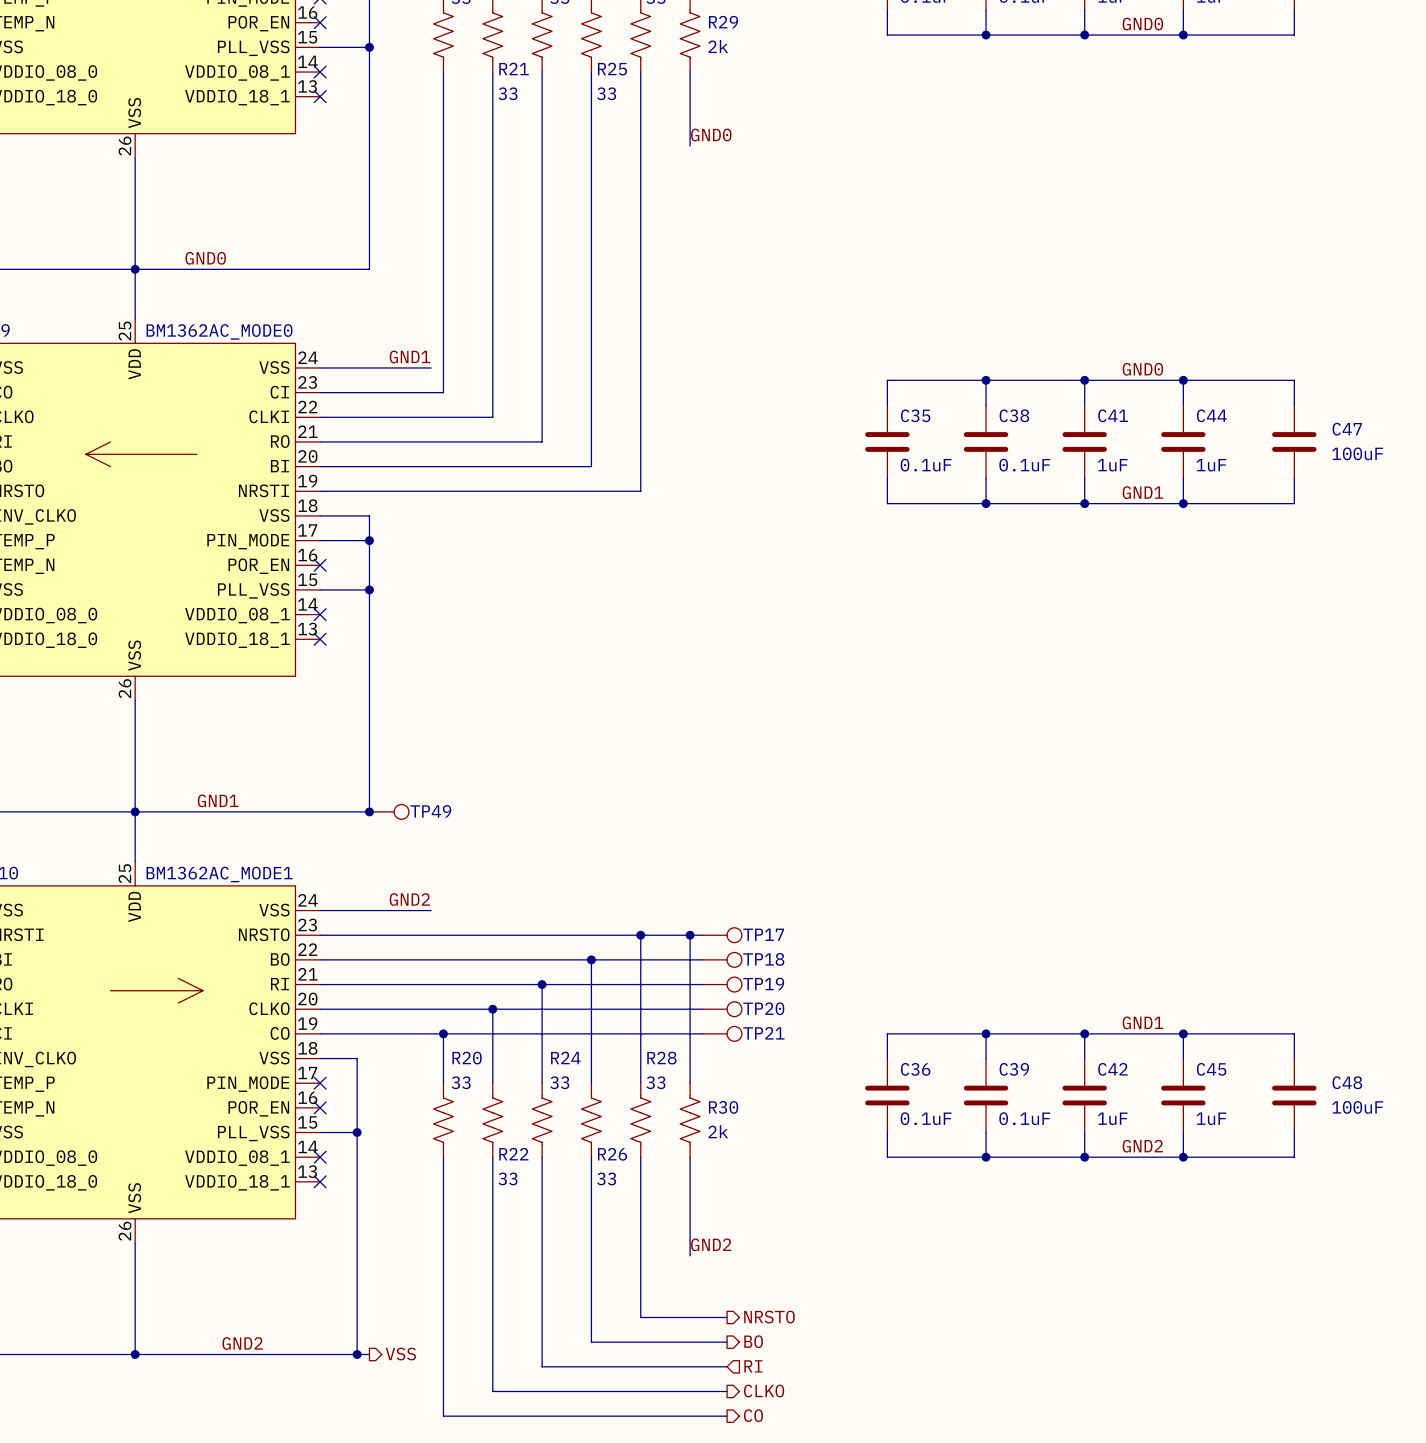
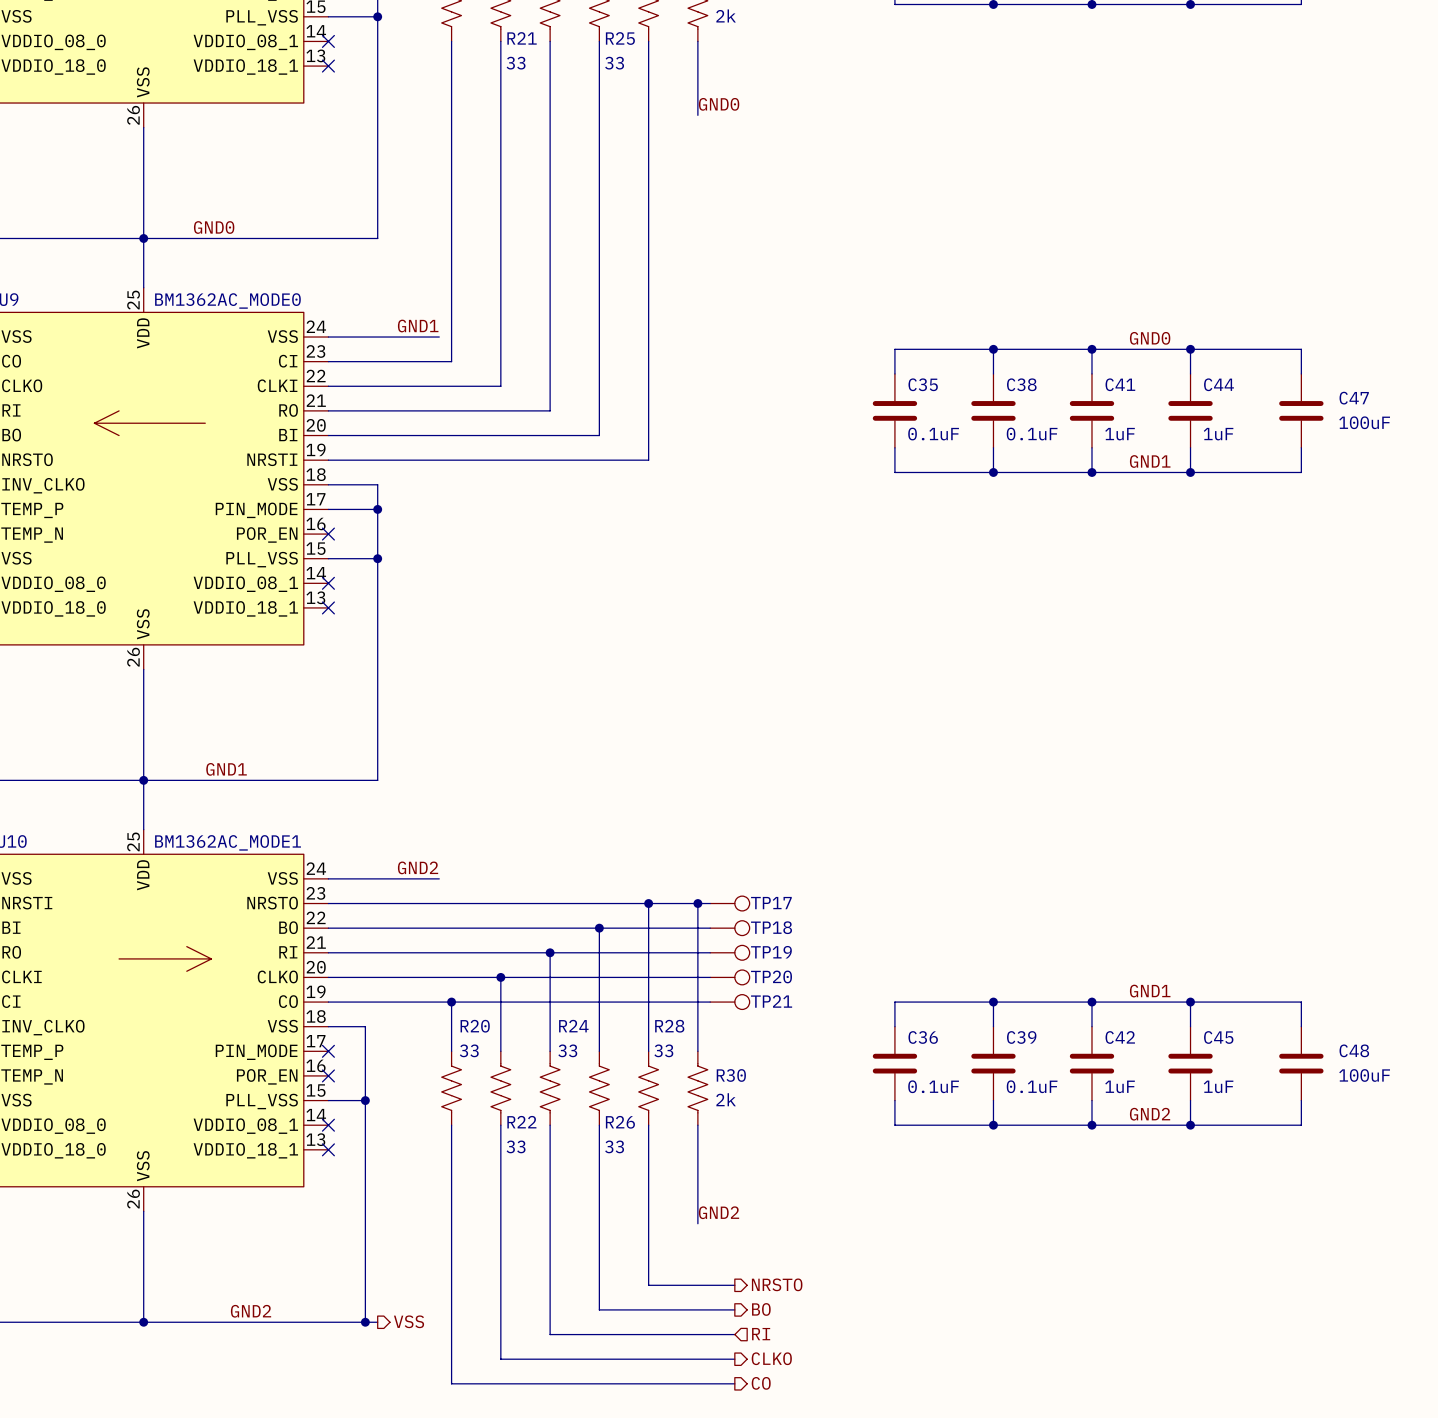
junction: (369, 811) -> none
TP49: (389, 811) -> none

